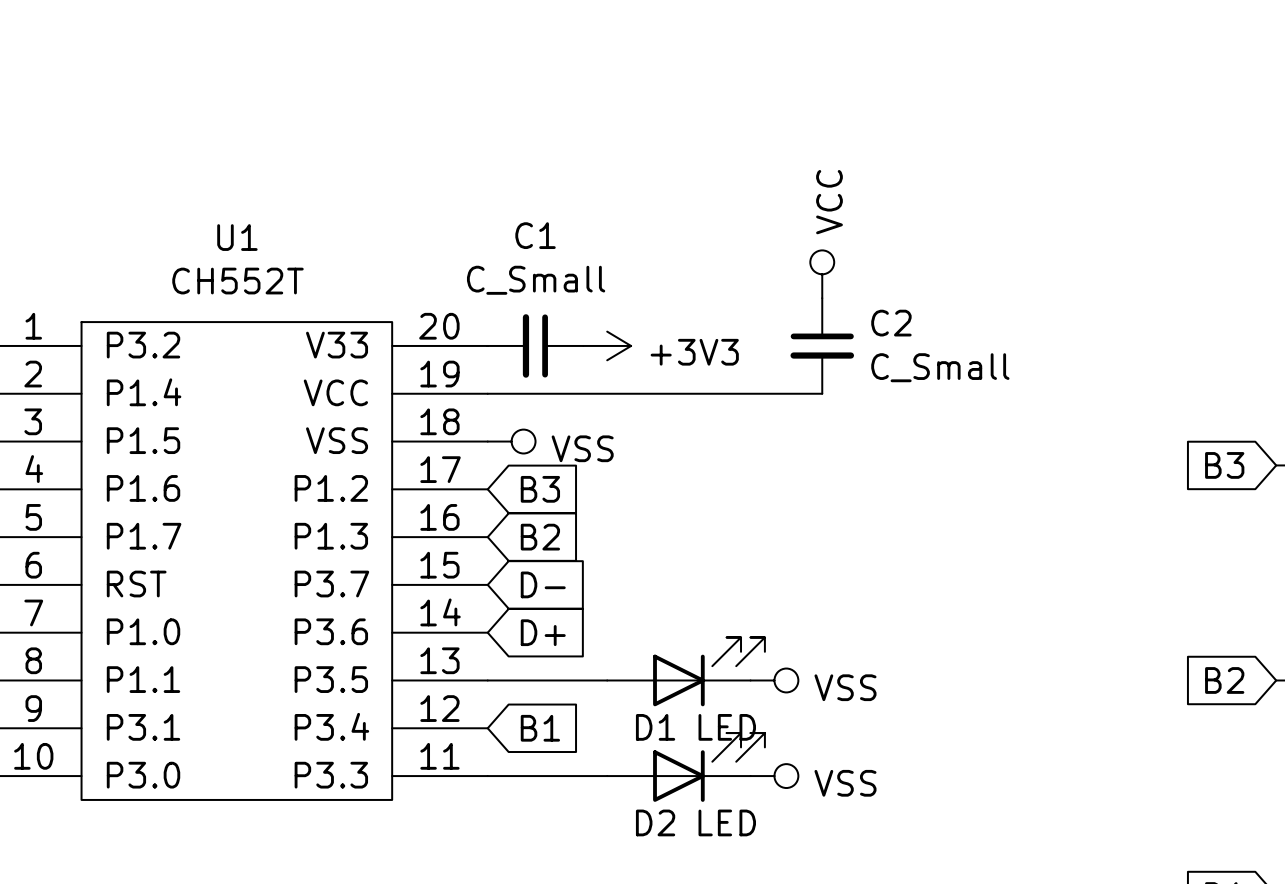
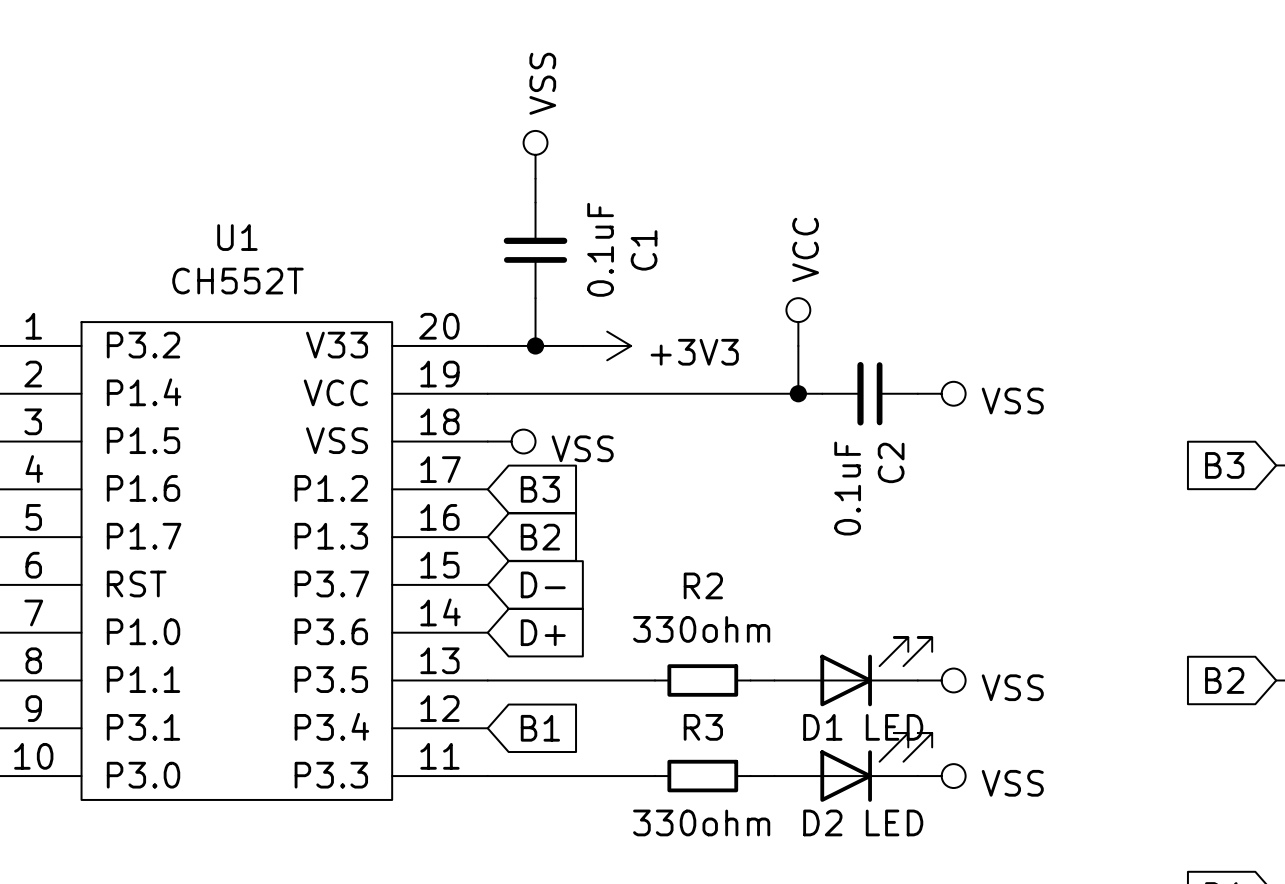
power symbol: none -> VSS (535, 154)
wire: none -> (535, 178) (535, 202)
power symbol position: VCC (822, 274) -> VCC (798, 322)
C1 value: C_Small (536, 280) -> 0.1uF (600, 249)
wire: none -> (535, 298) (535, 345)
C1 rotation: 0° (535, 345) -> 90° clockwise (535, 250)
C1 position: (535, 345) -> (535, 250)
junction: none -> (535, 345)
wire: none -> (798, 345) (798, 393)
C2 position: (822, 345) -> (870, 393)
C2 rotation: 0° (822, 346) -> 90° clockwise (869, 393)
C2 value: C_Small (940, 367) -> 0.1uF (847, 488)
junction: none -> (798, 393)
power symbol: none -> VSS (941, 393)
D1 position: (686, 671) -> (853, 671)
R2: none -> 330ohm (702, 680)
power symbol: VSS (774, 680) -> none
power symbol: none -> VSS (941, 680)
D2 position: (686, 767) -> (853, 767)
R3: none -> 330ohm (702, 776)
power symbol: VSS (774, 776) -> none
power symbol: none -> VSS (941, 776)

